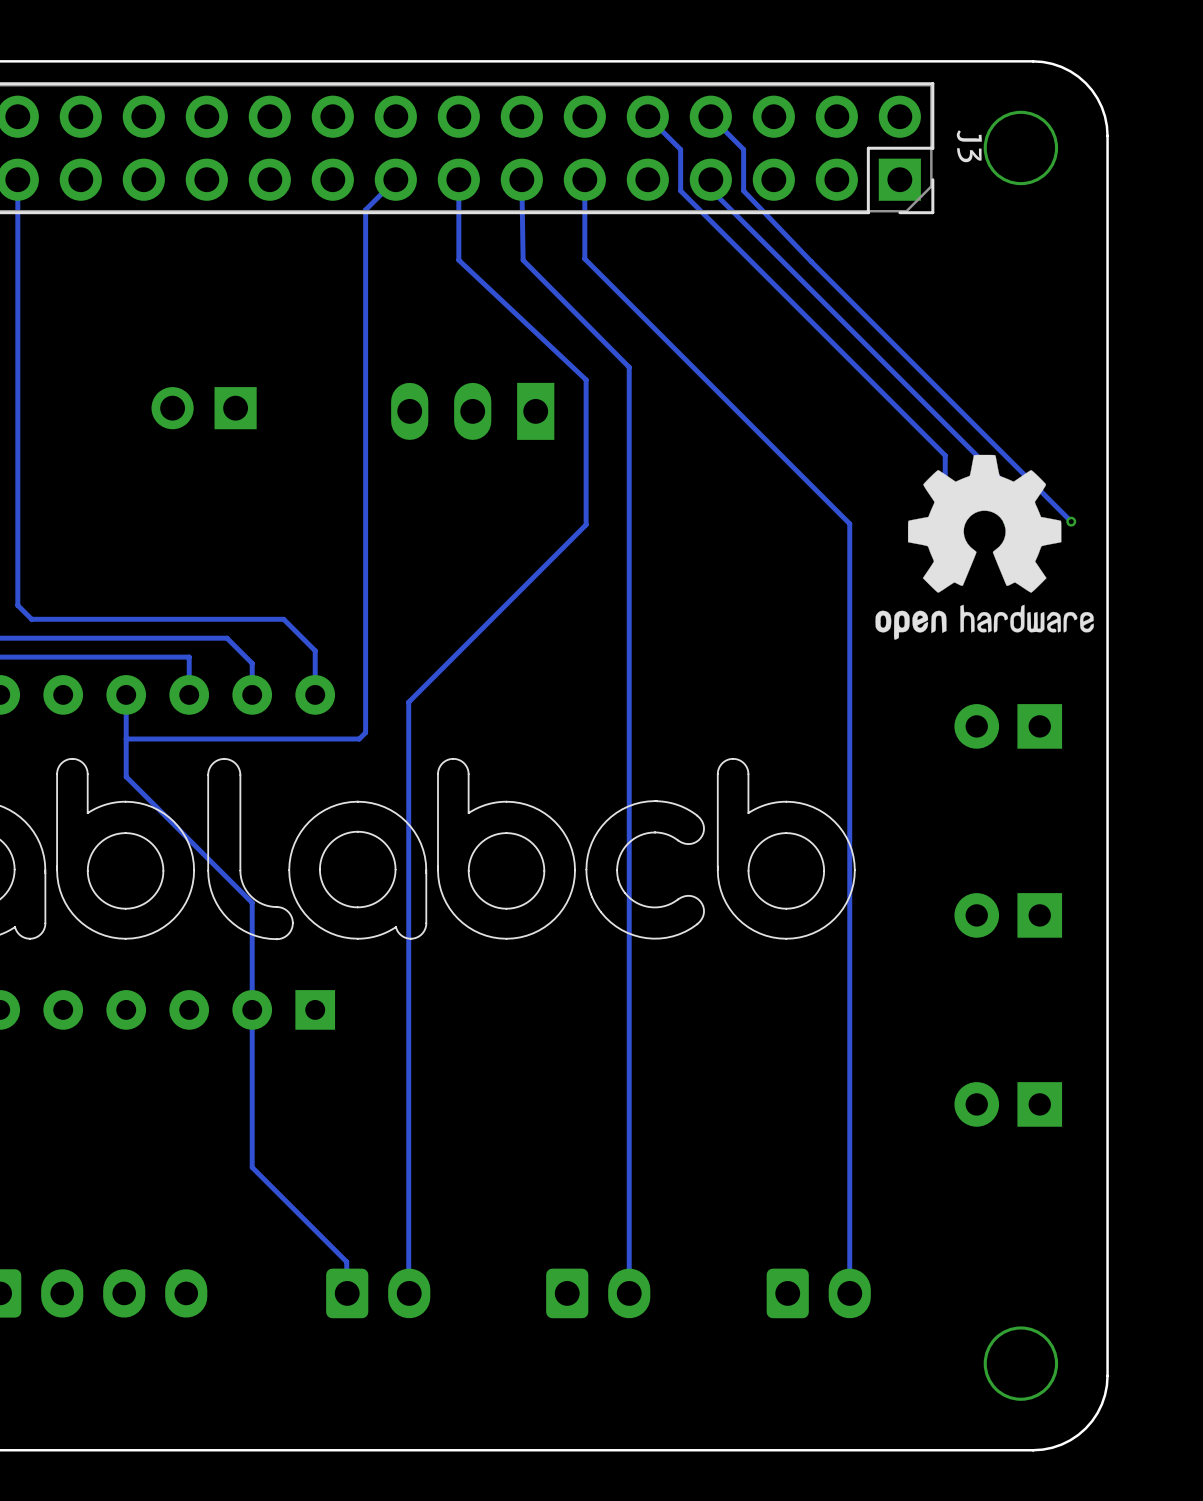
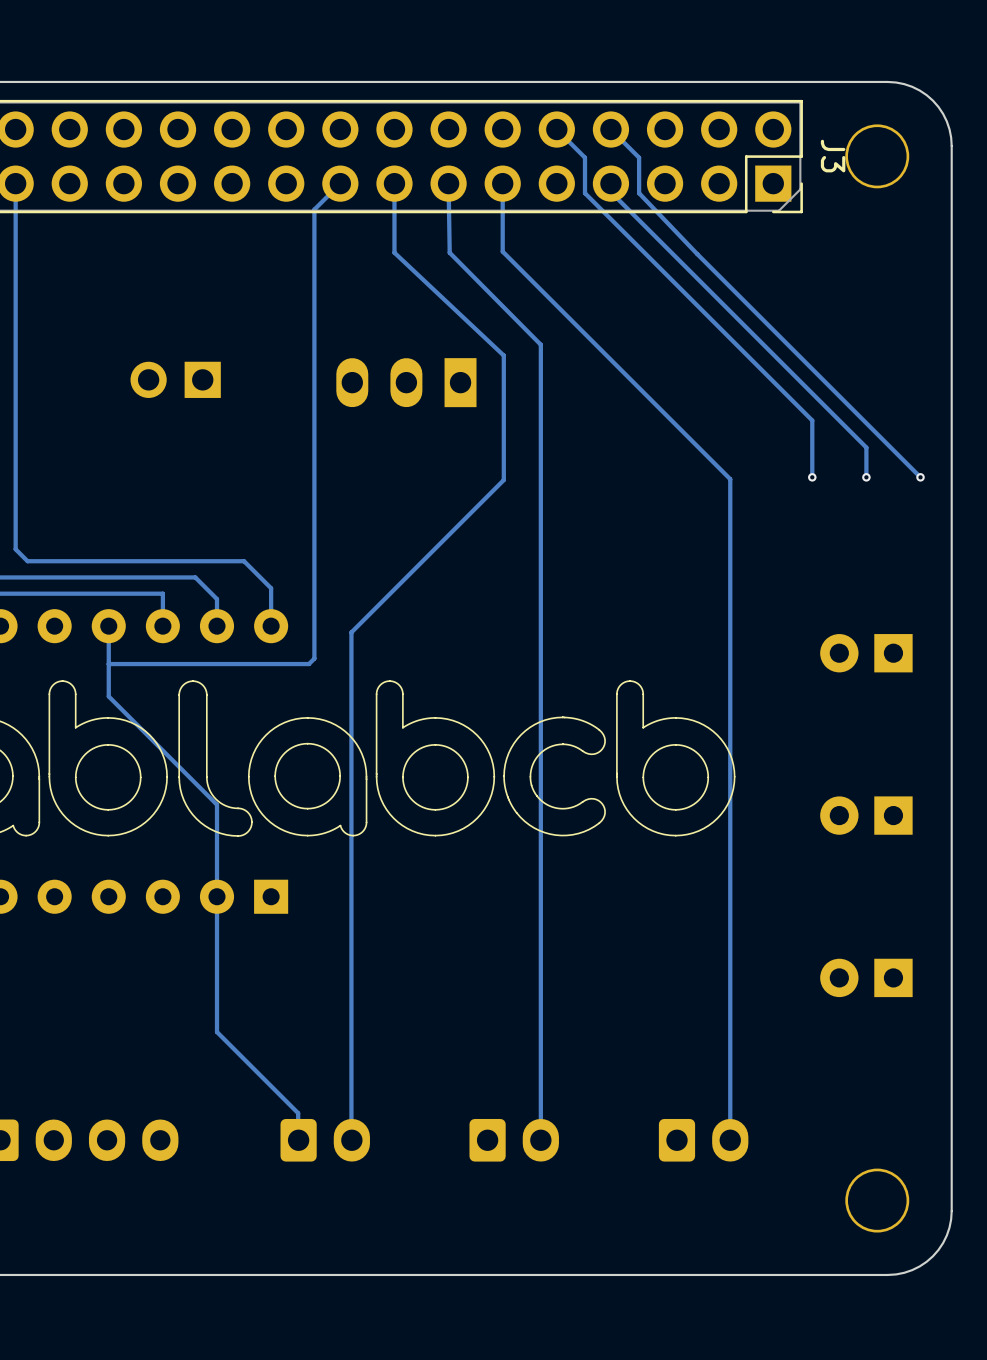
drawing: [875, 454, 1094, 640] -> none

